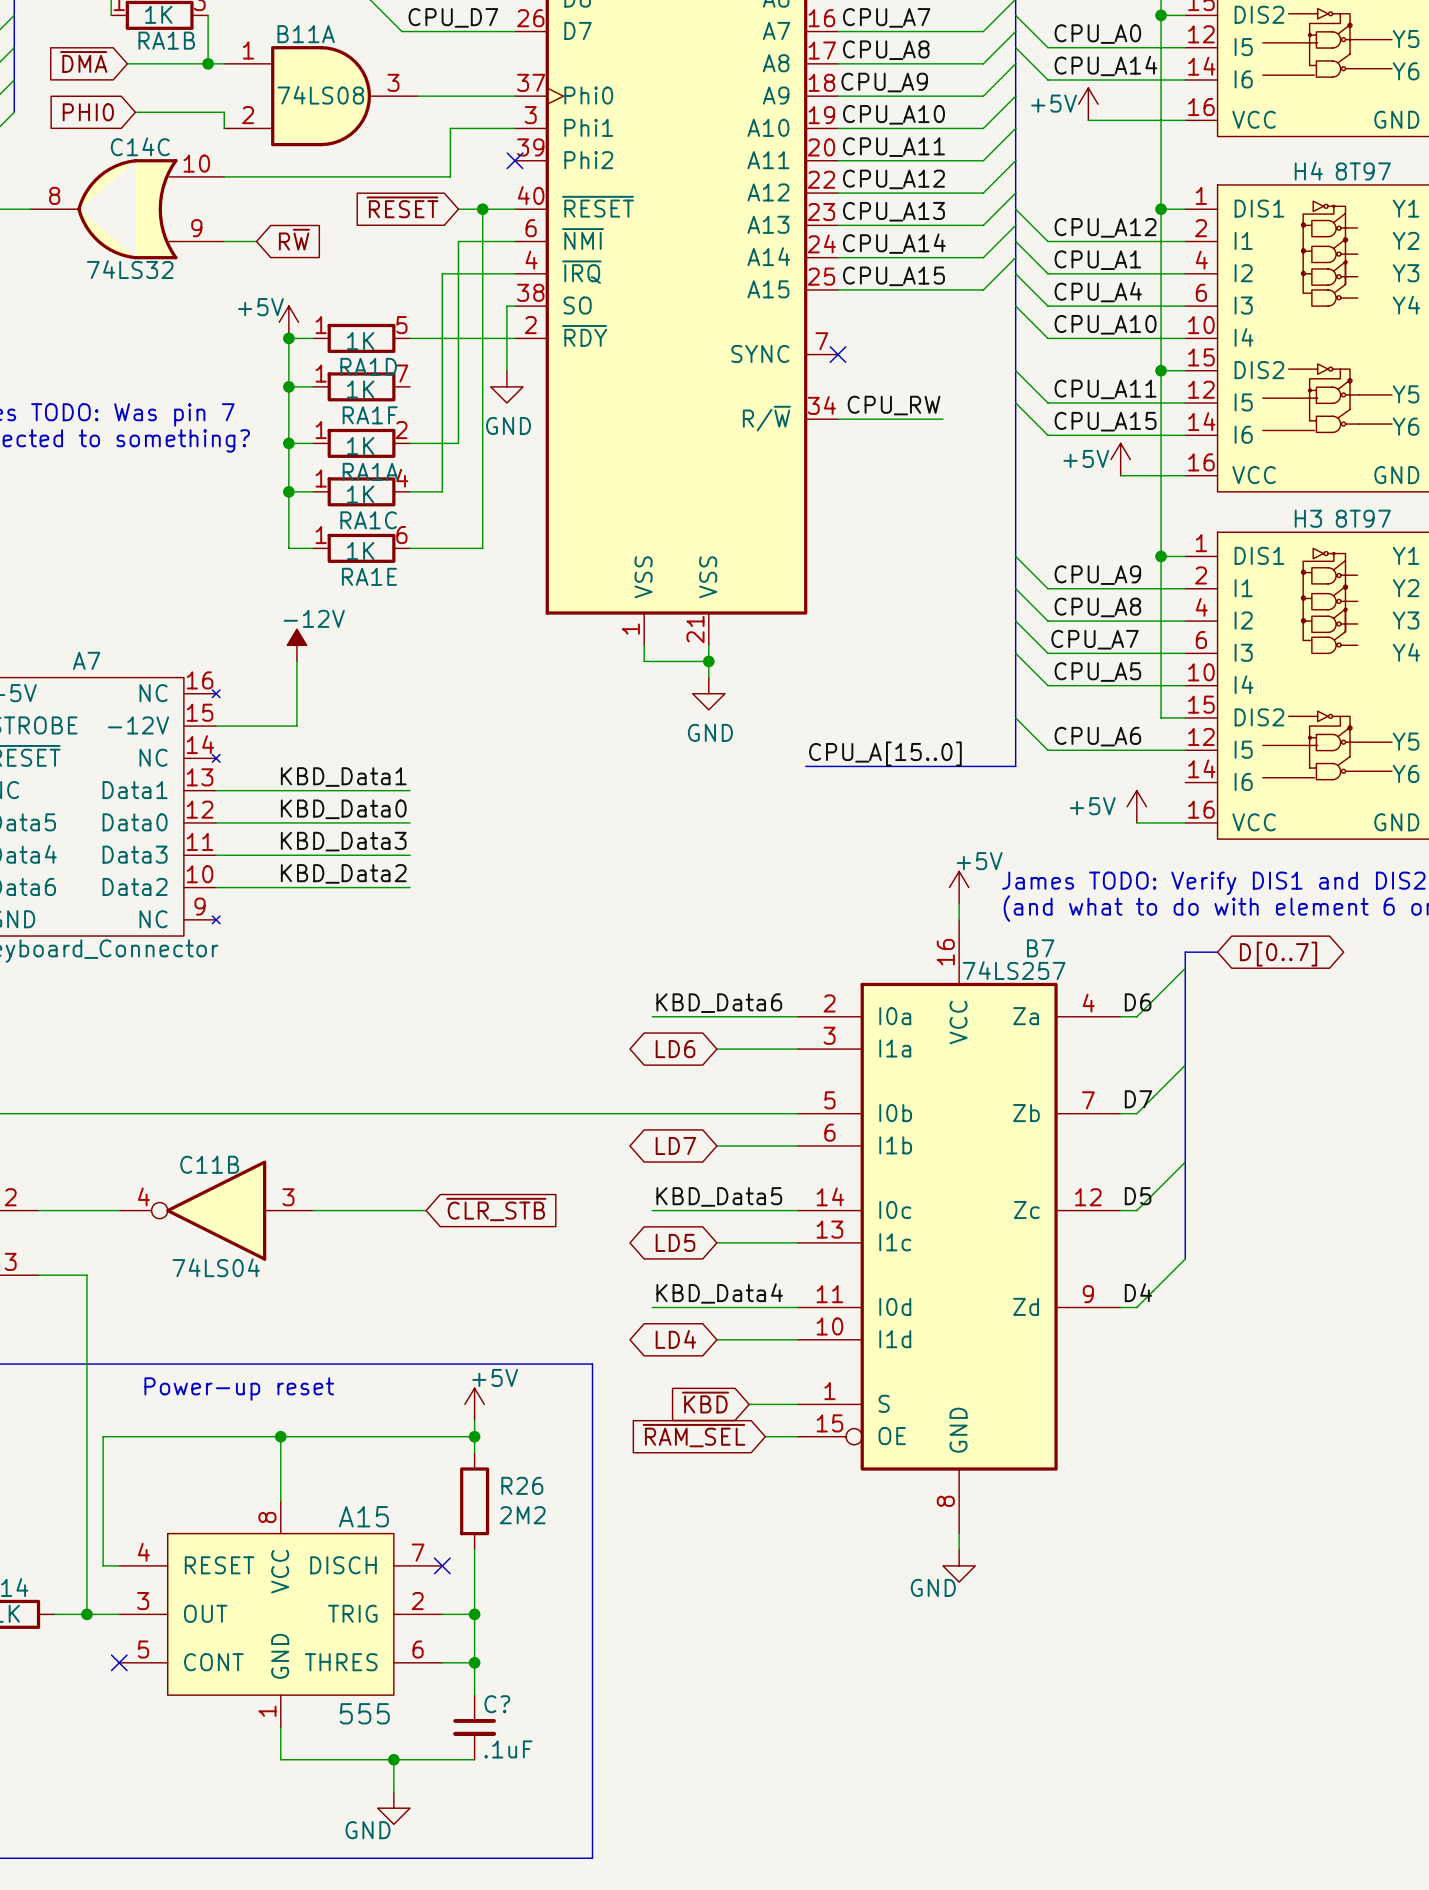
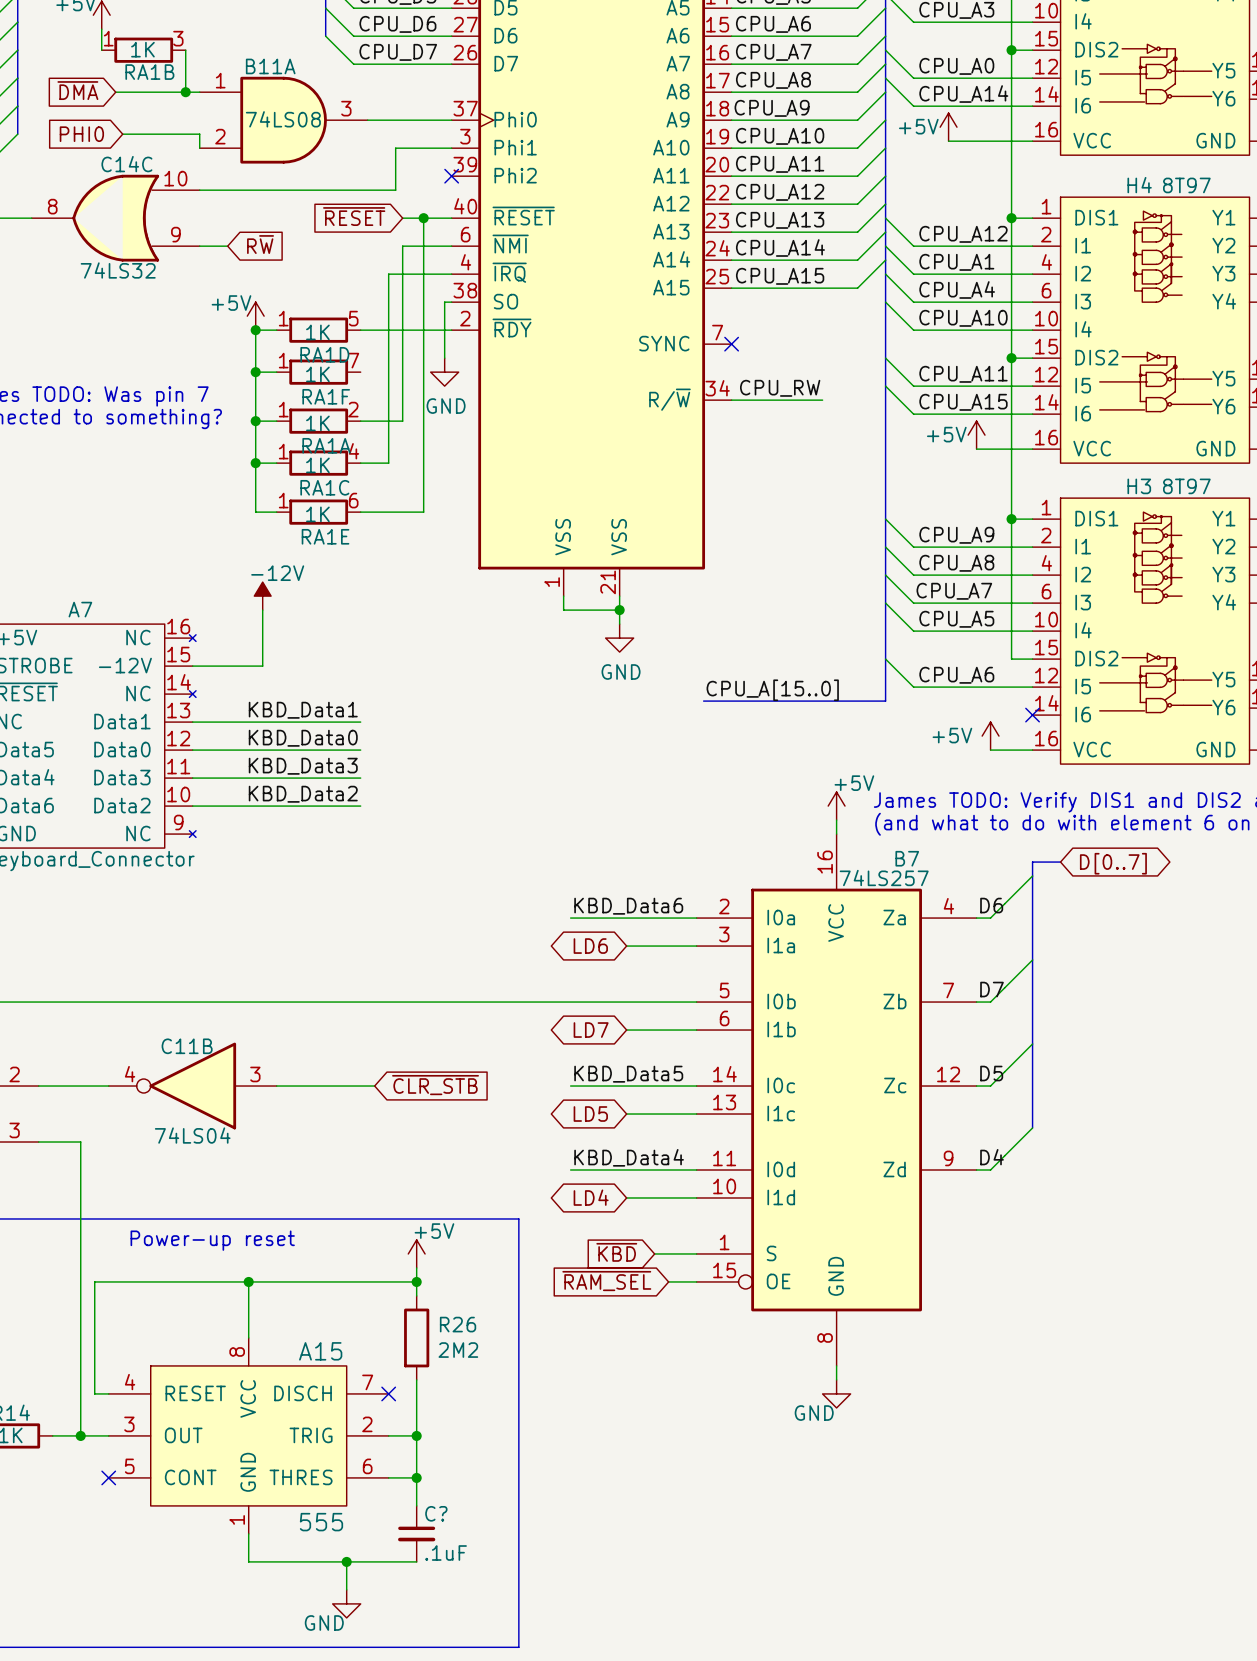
no-connect mark: none -> (1032, 715)

